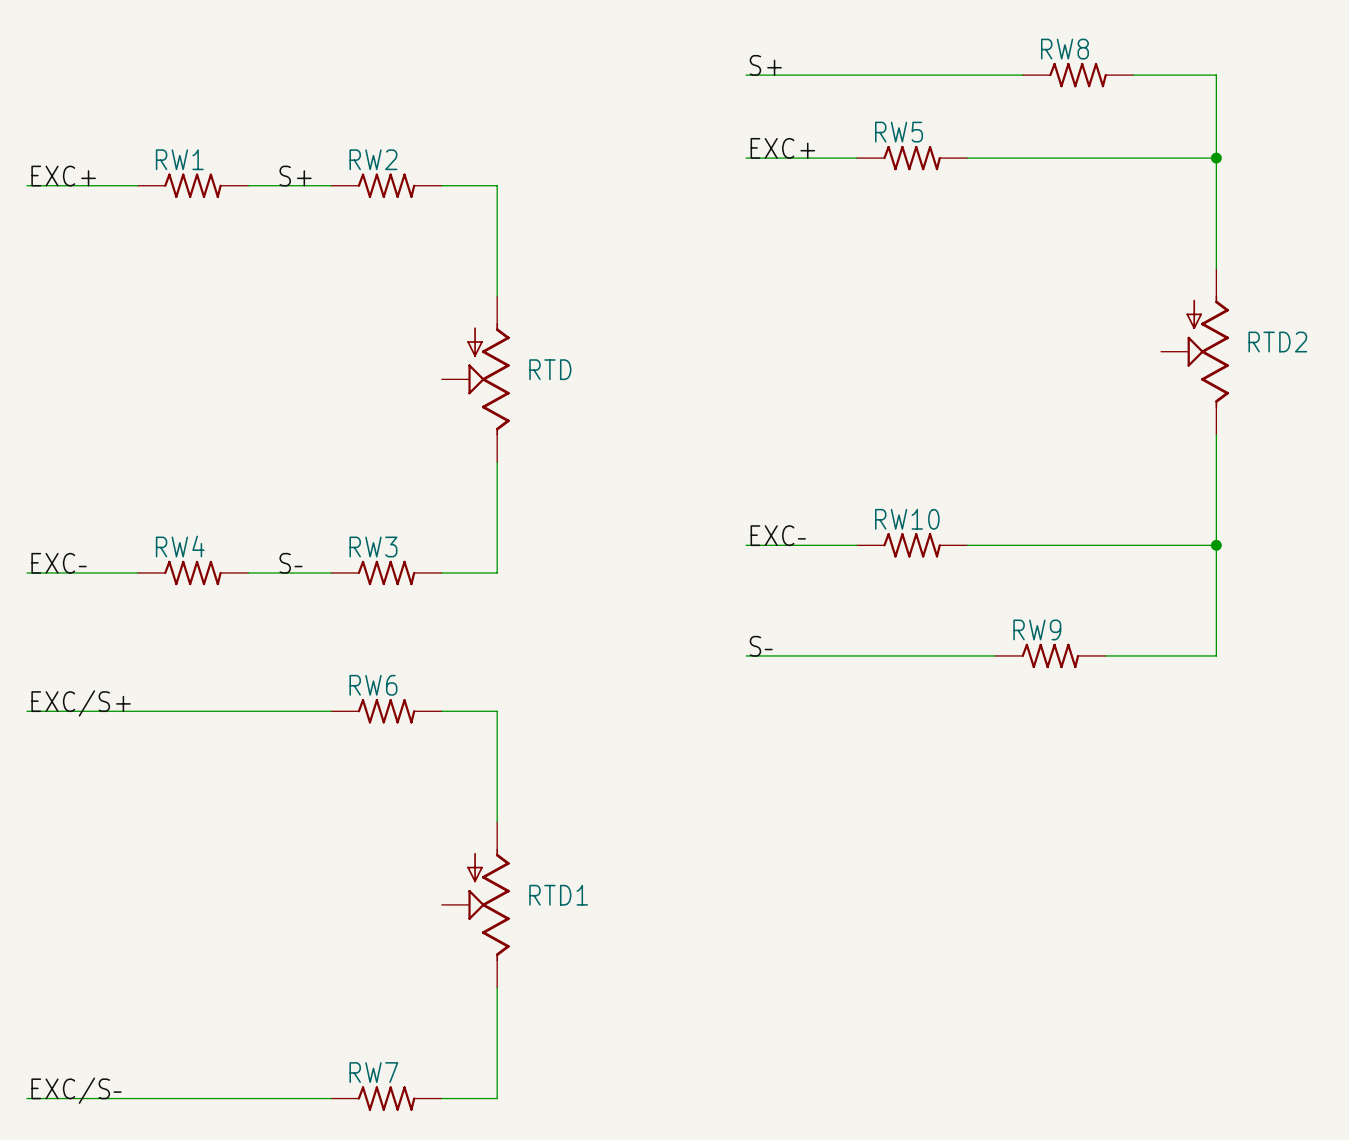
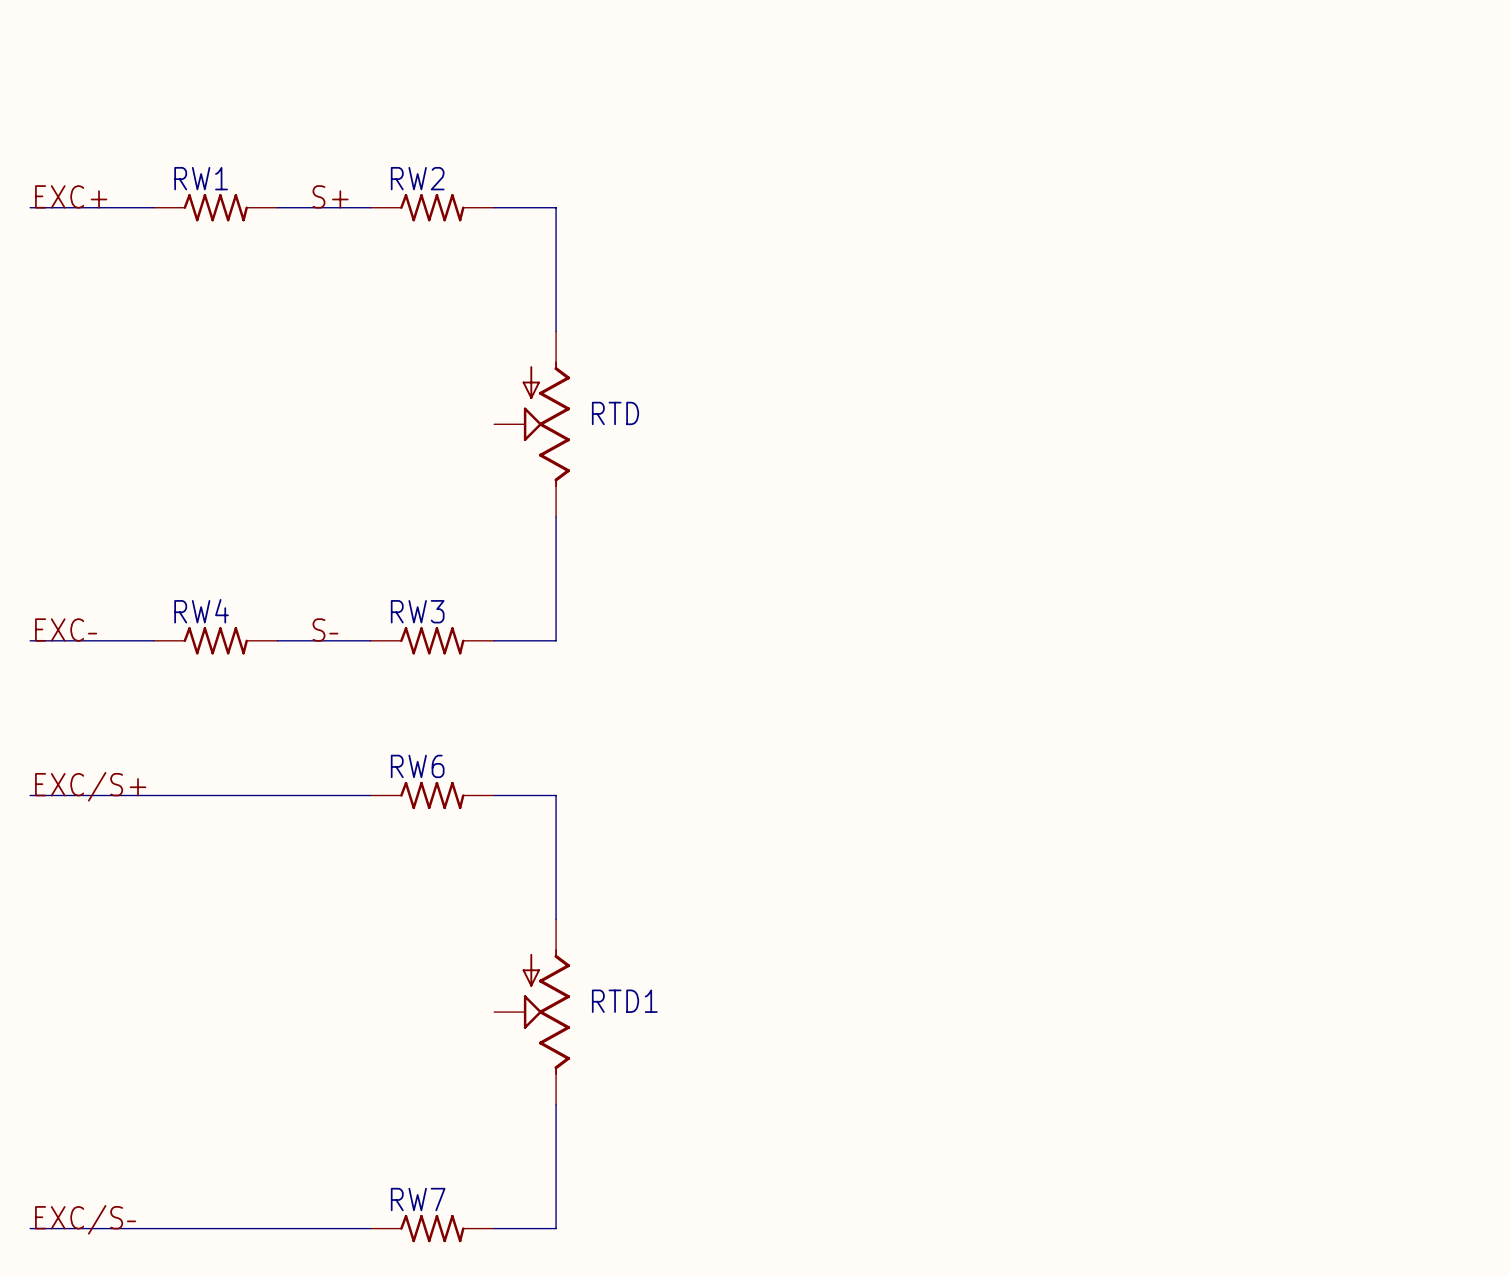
label: S+ (765, 65) -> none
wire: (746, 75) (1022, 75) -> none
RW8: (1078, 75) -> none
wire: (1133, 75) (1216, 75) (1216, 268) -> none
label: EXC+ (782, 148) -> none
wire: (746, 158) (856, 158) -> none
RW5: (912, 158) -> none
wire: (967, 158) (1216, 158) -> none
junction: (1216, 158) -> none
RTD2: (1194, 351) -> none
wire: (1216, 434) (1216, 655) (1105, 655) -> none
label: EXC– (778, 535) -> none
wire: (746, 545) (856, 545) -> none
RW10: (912, 545) -> none
wire: (967, 545) (1216, 545) -> none
junction: (1216, 545) -> none
label: S– (761, 646) -> none
wire: (746, 655) (995, 655) -> none
RW9: (1050, 655) -> none

